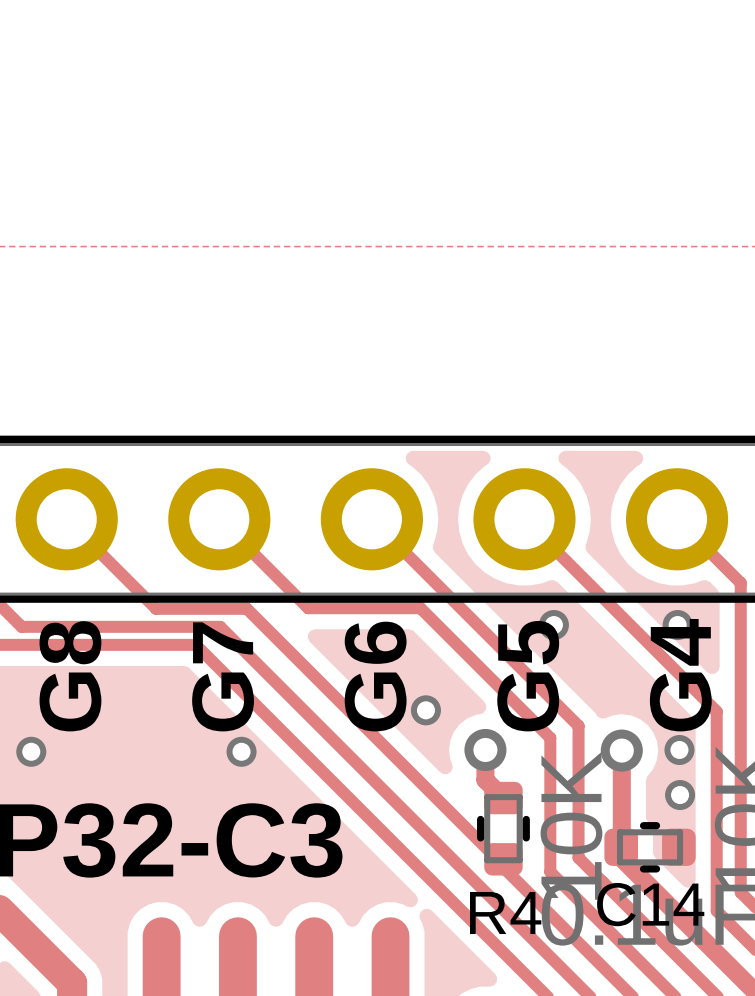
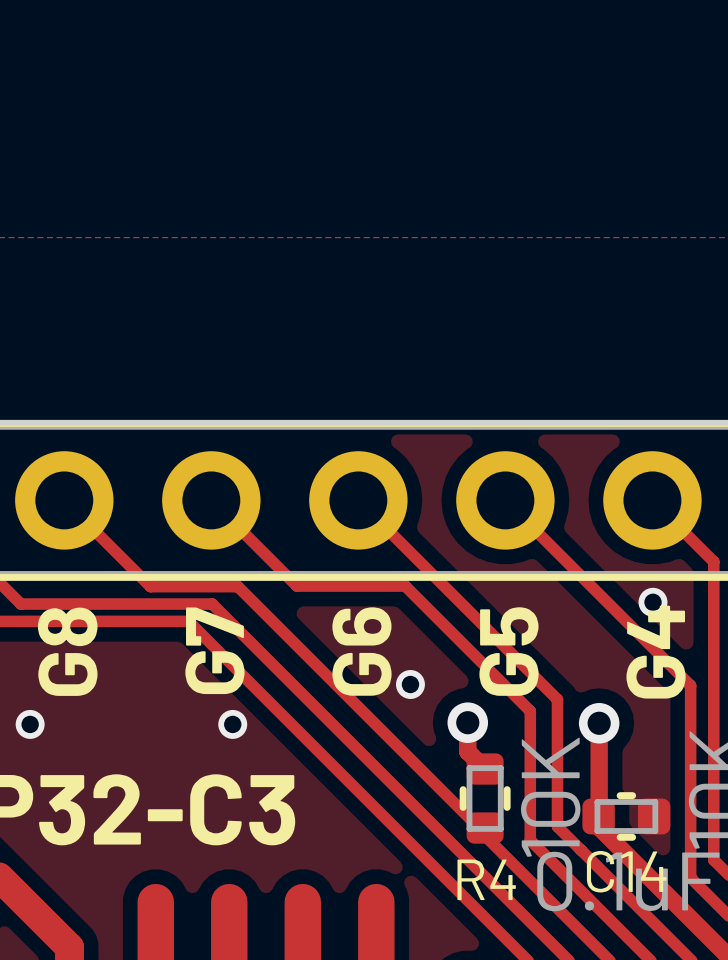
via: (553, 625) -> none
via: (679, 749) -> none
via: (680, 795) -> none

